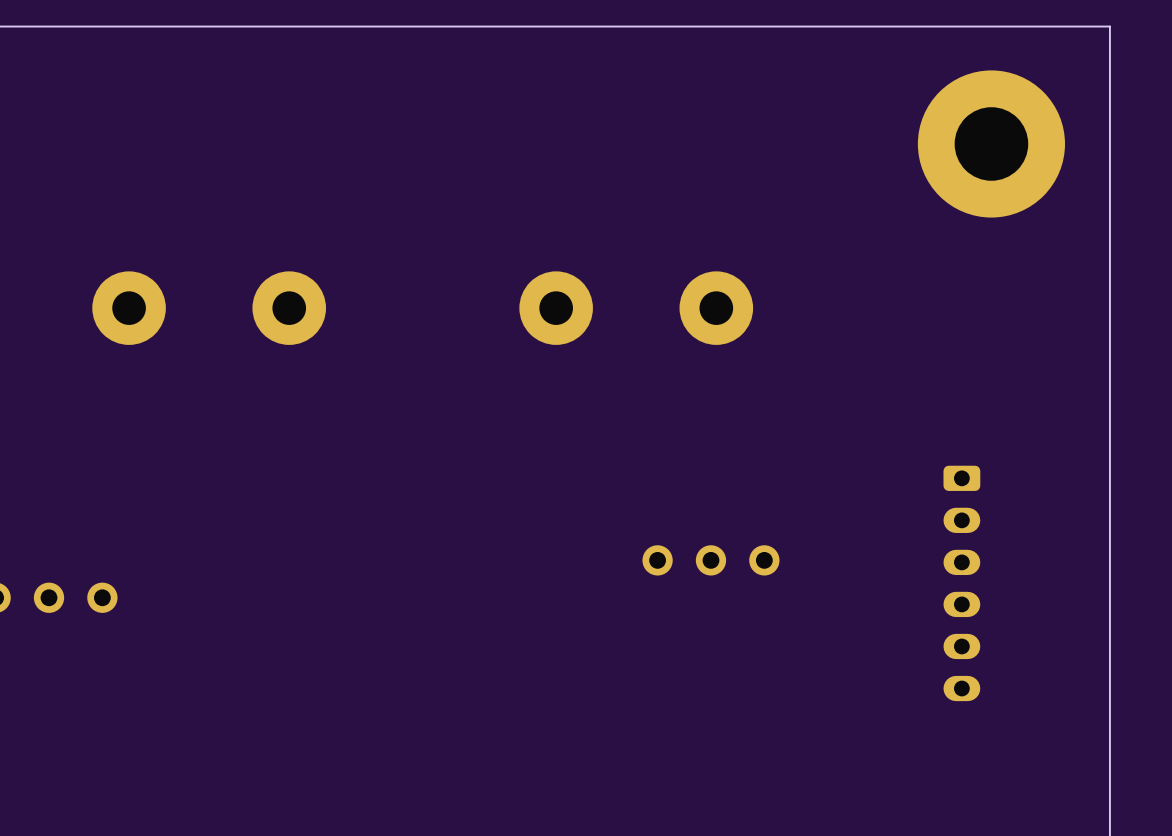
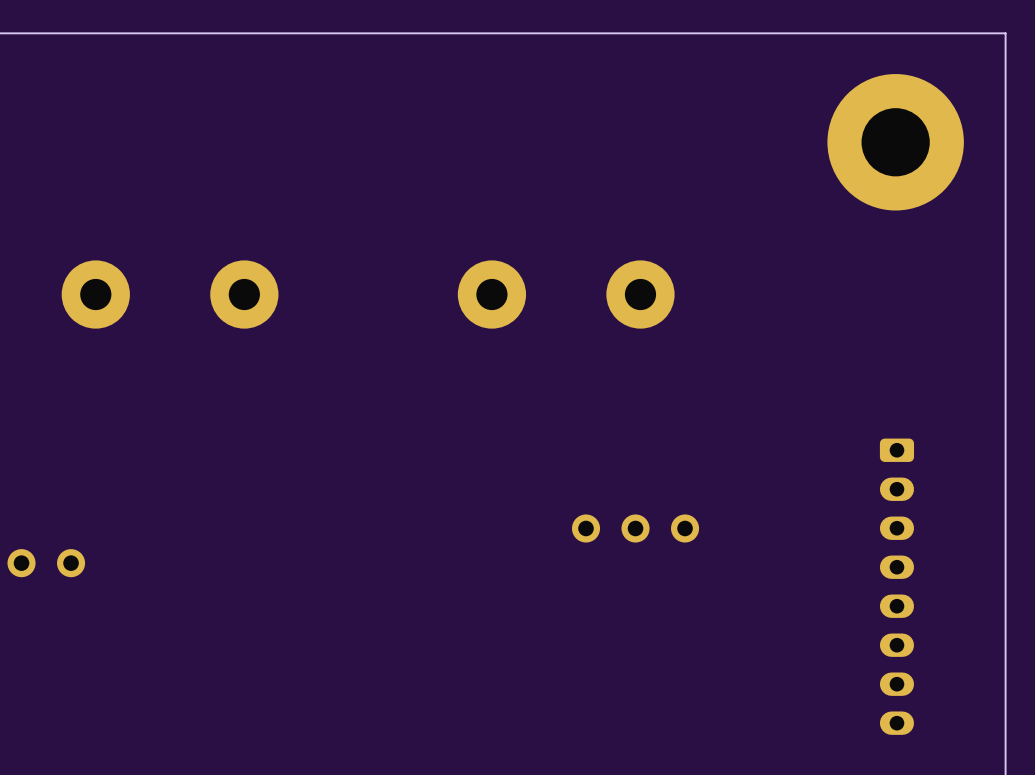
part: (961, 583) -> none
part: none -> (896, 586)

